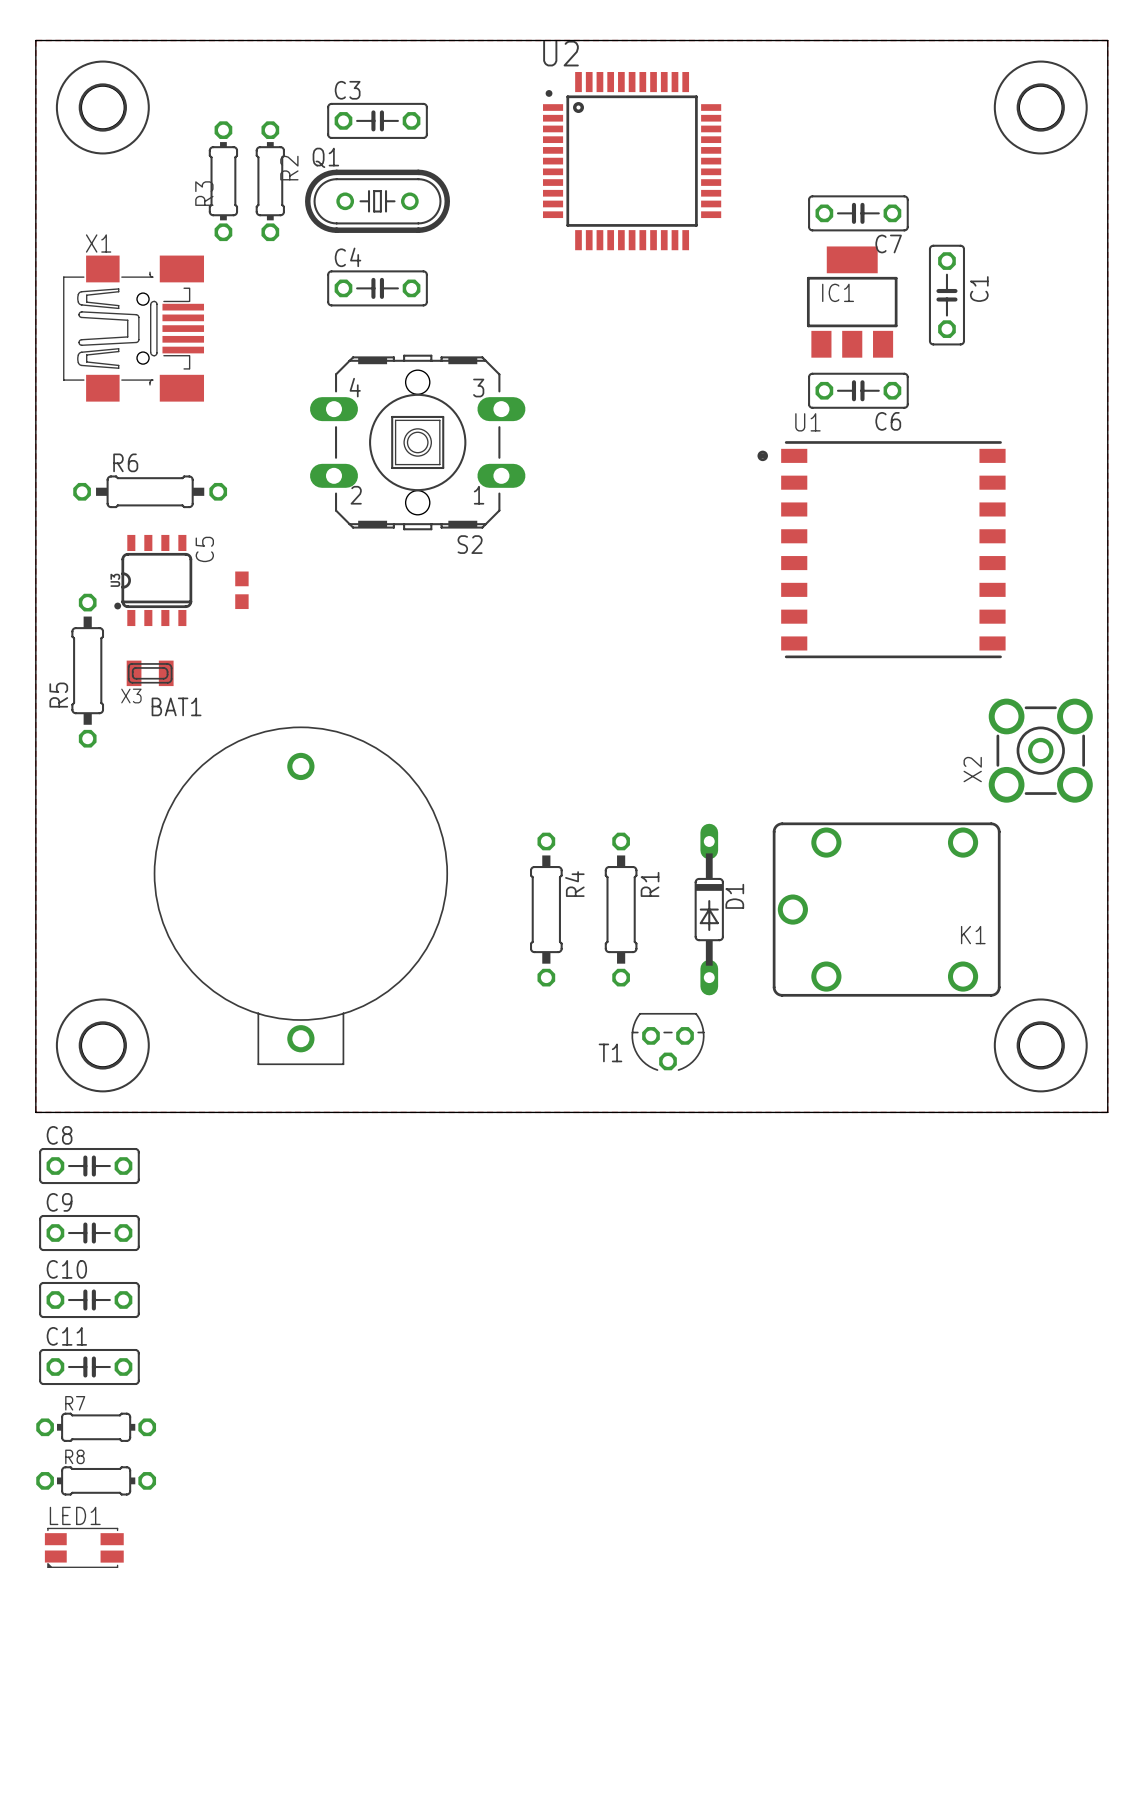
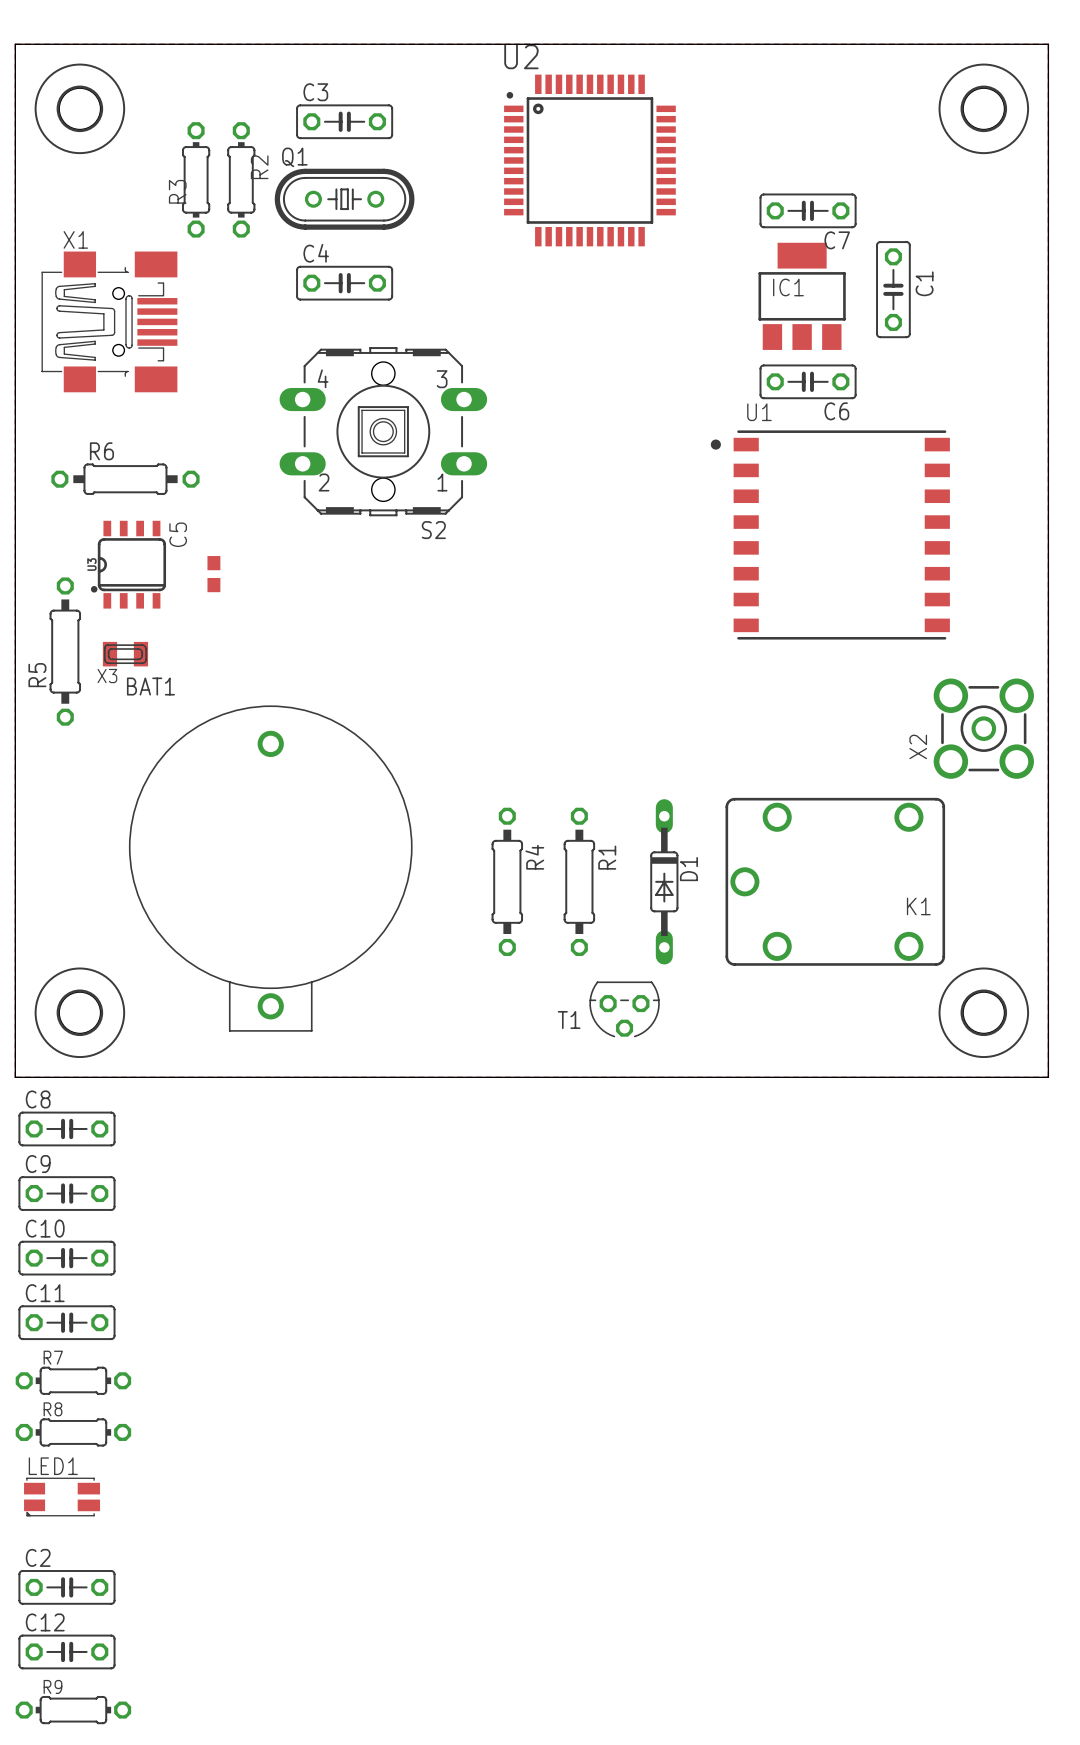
C2: none -> (66, 1587)
C12: none -> (66, 1651)
R9: none -> (73, 1710)

